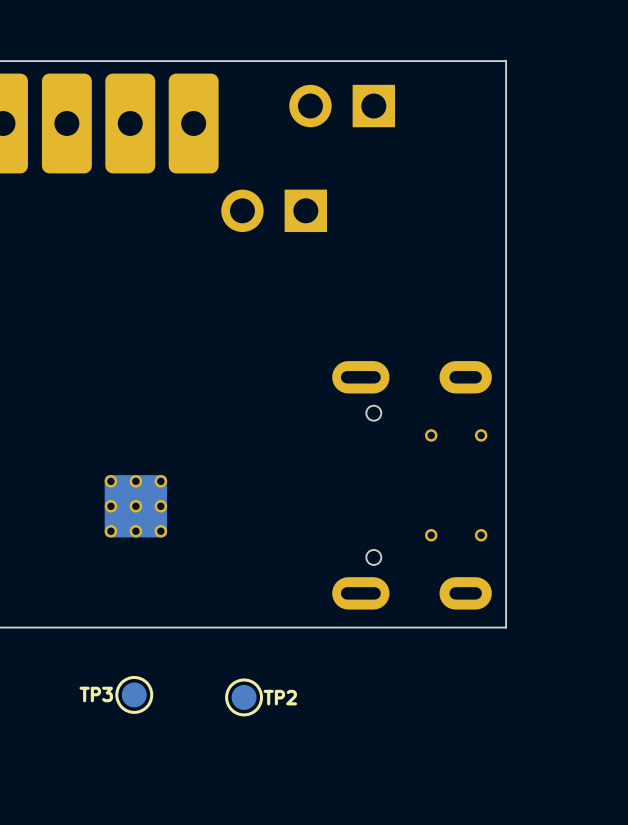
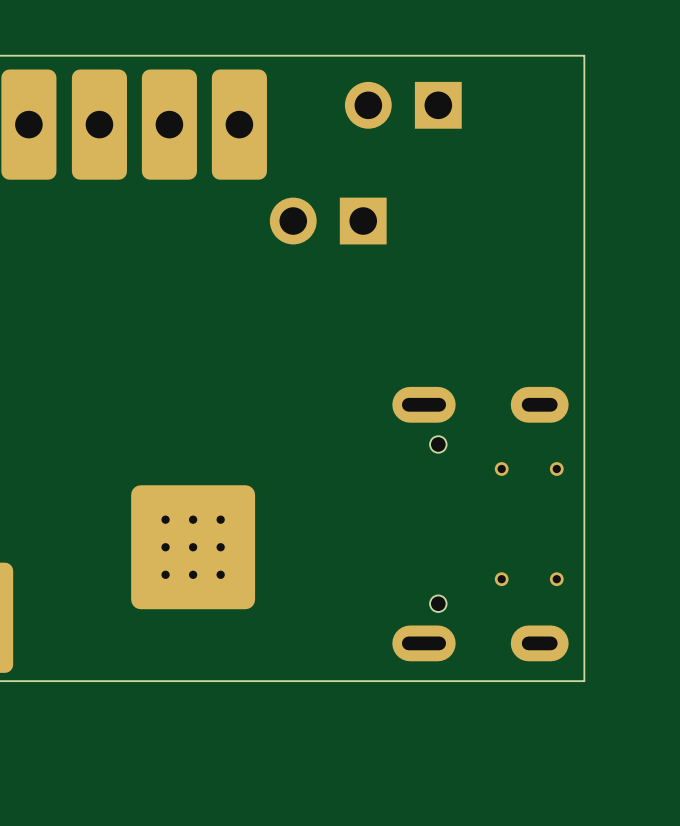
part footprint: [104, 475, 168, 538] -> [131, 485, 256, 610]
TP3: (134, 694) -> none
TP2: (244, 697) -> none

